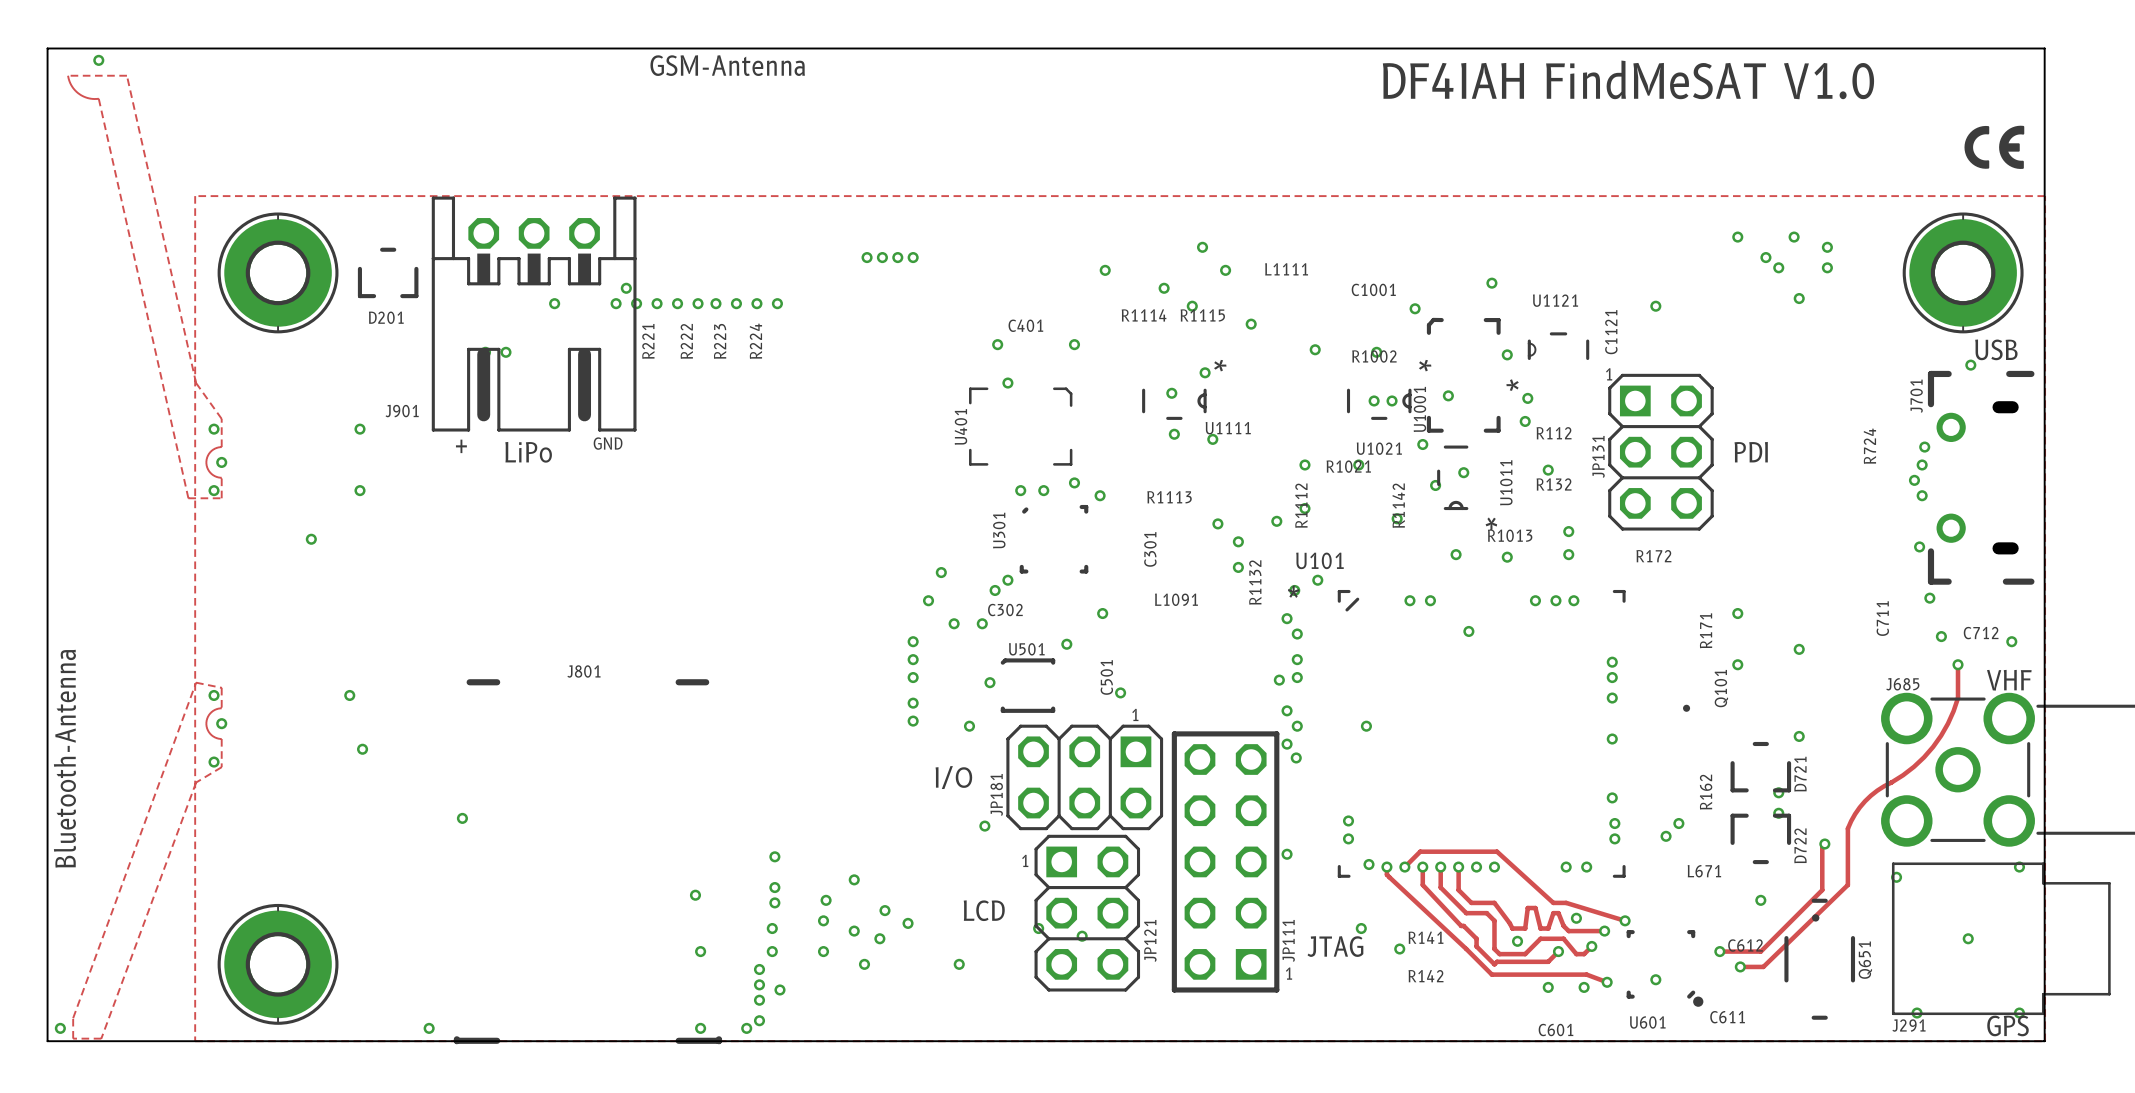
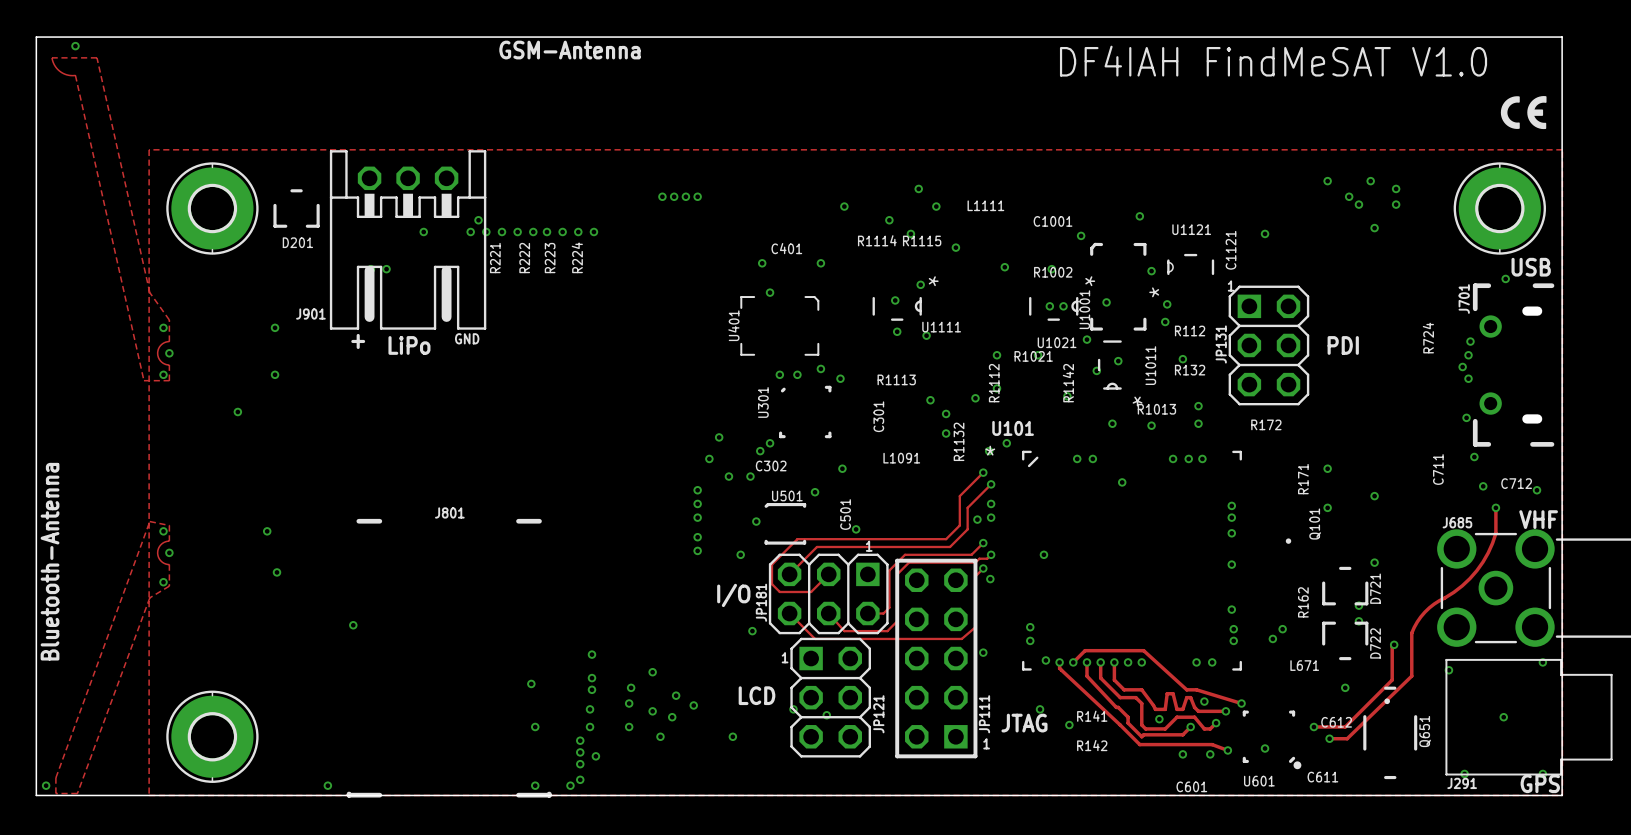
track: none -> (983, 472) (959, 496) (959, 525) (946, 539) (797, 539) (771, 564) (771, 584) (779, 591) (811, 591) (828, 574)
track: none -> (991, 484) (967, 507) (967, 529) (950, 546) (816, 546) (789, 574)
track: none -> (983, 543) (971, 554) (905, 554) (889, 570) (889, 607) (883, 613) (867, 613)
track: none -> (991, 554) (987, 558) (979, 558) (975, 562) (908, 562) (897, 574) (897, 621) (887, 631) (844, 631) (828, 613)
track: none -> (983, 568) (975, 576) (975, 627) (961, 638) (815, 638) (789, 613)

